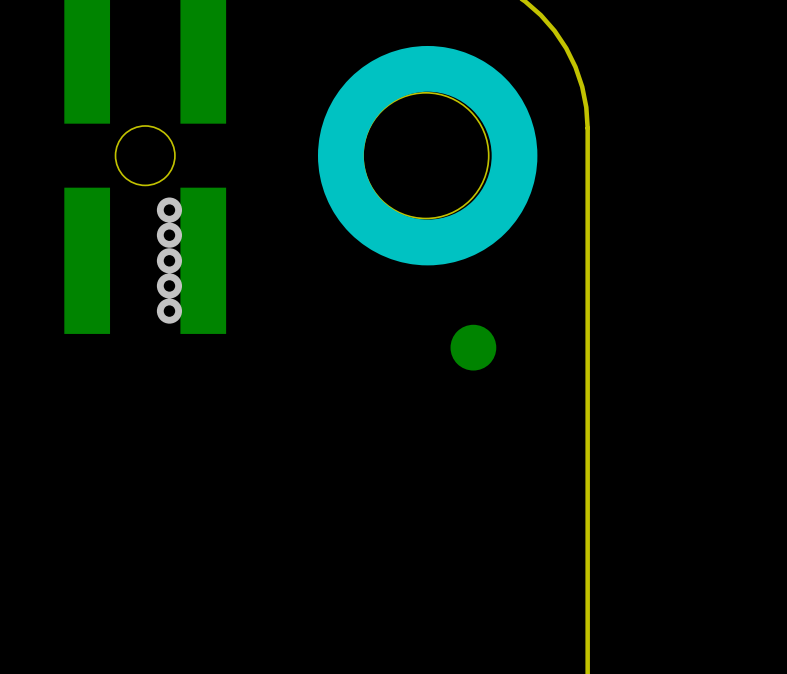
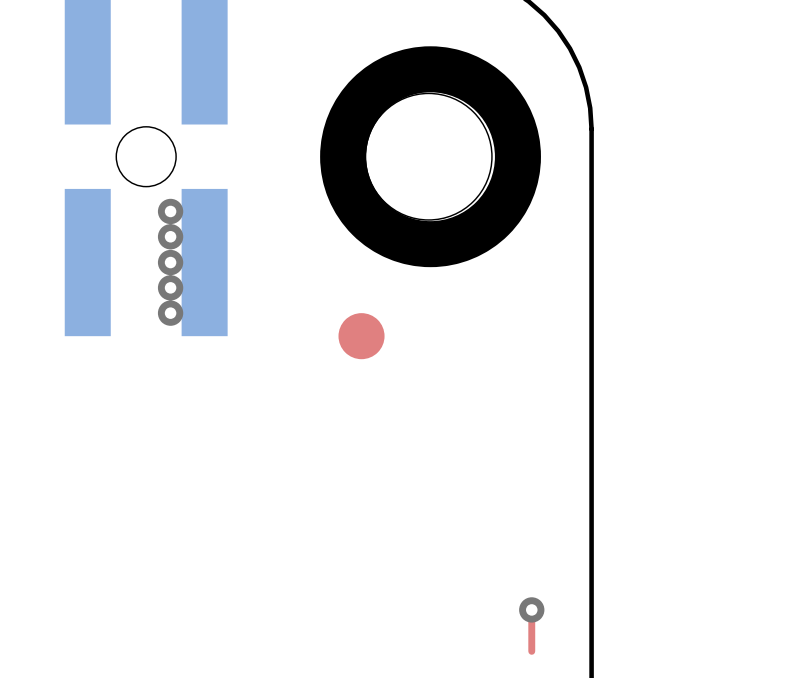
part: none -> (361, 336)
part: (473, 347) -> none
top track: none -> (531, 609) (531, 651)
via: none -> (531, 609)

